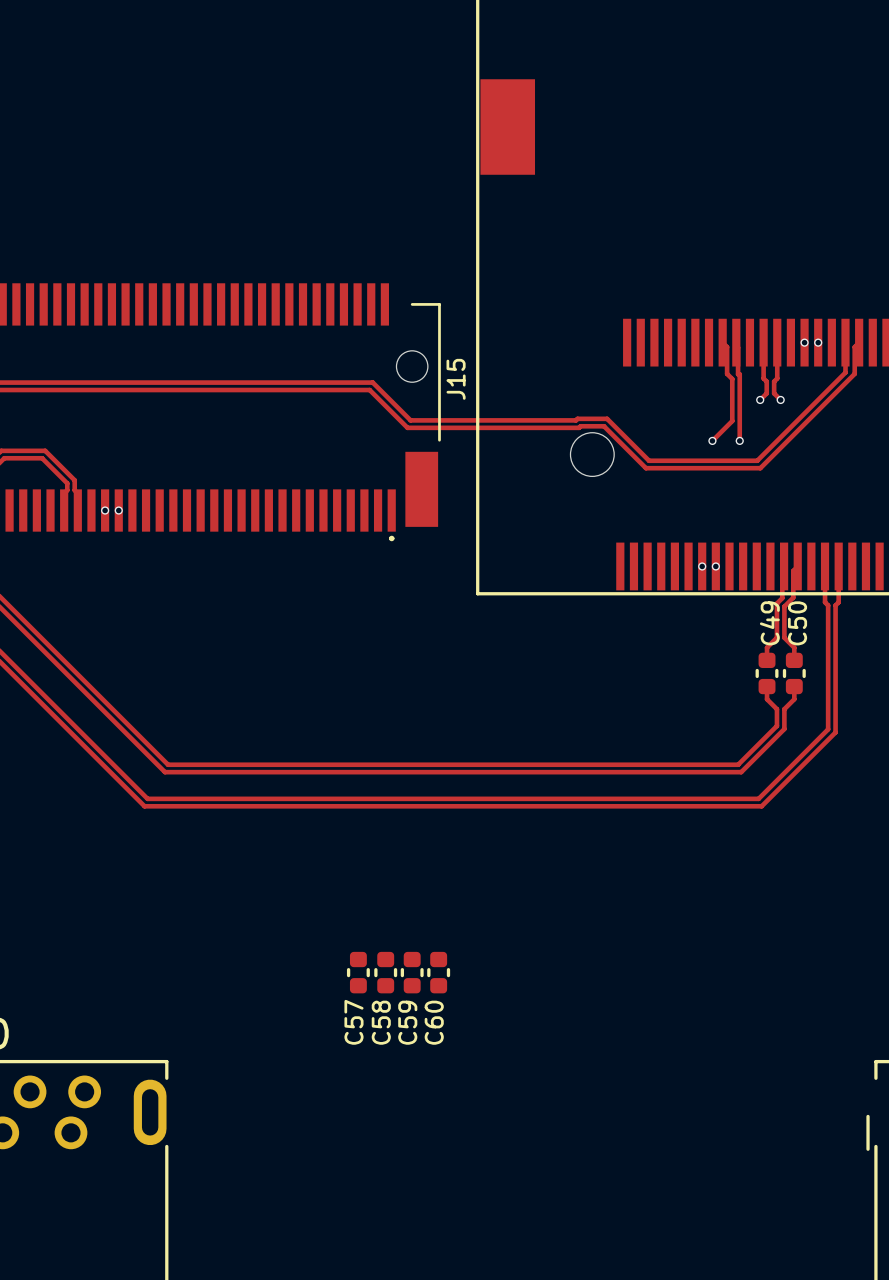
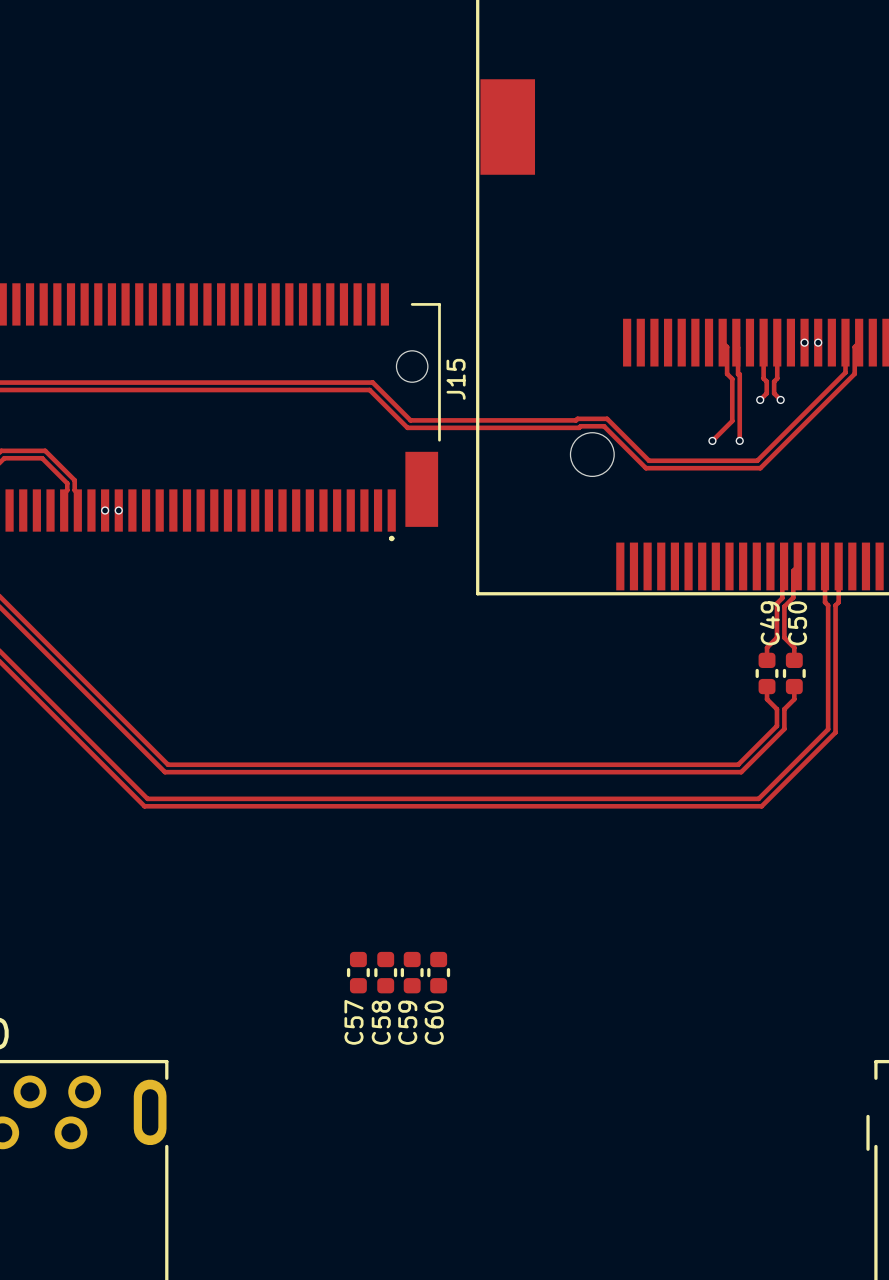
via: (702, 566) -> none
via: (715, 566) -> none

